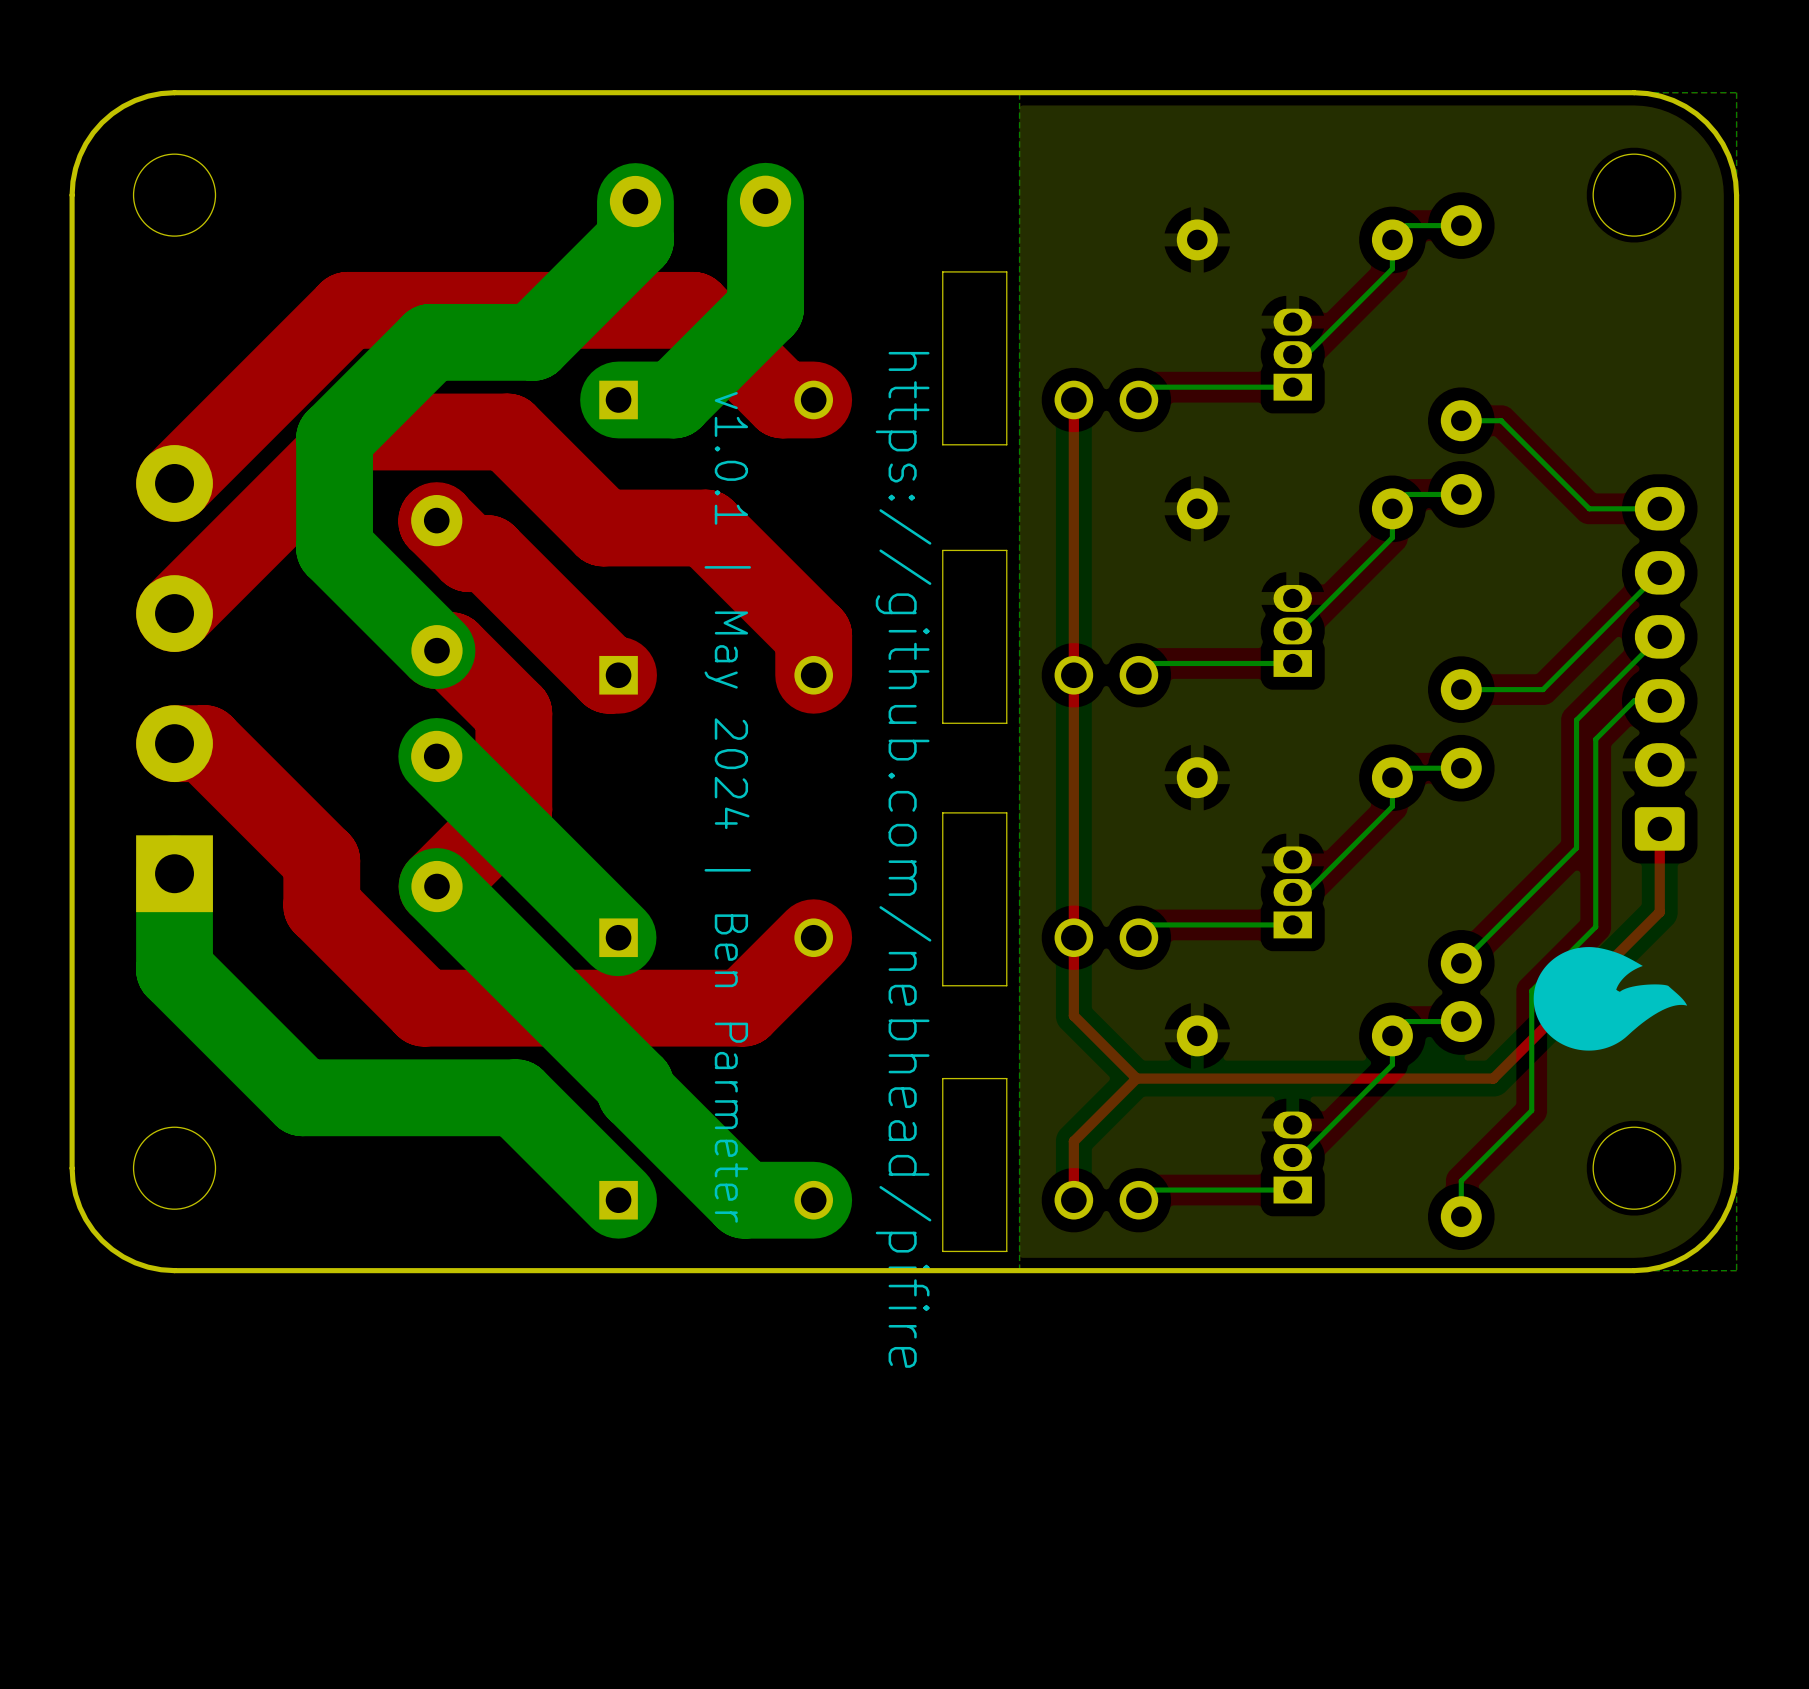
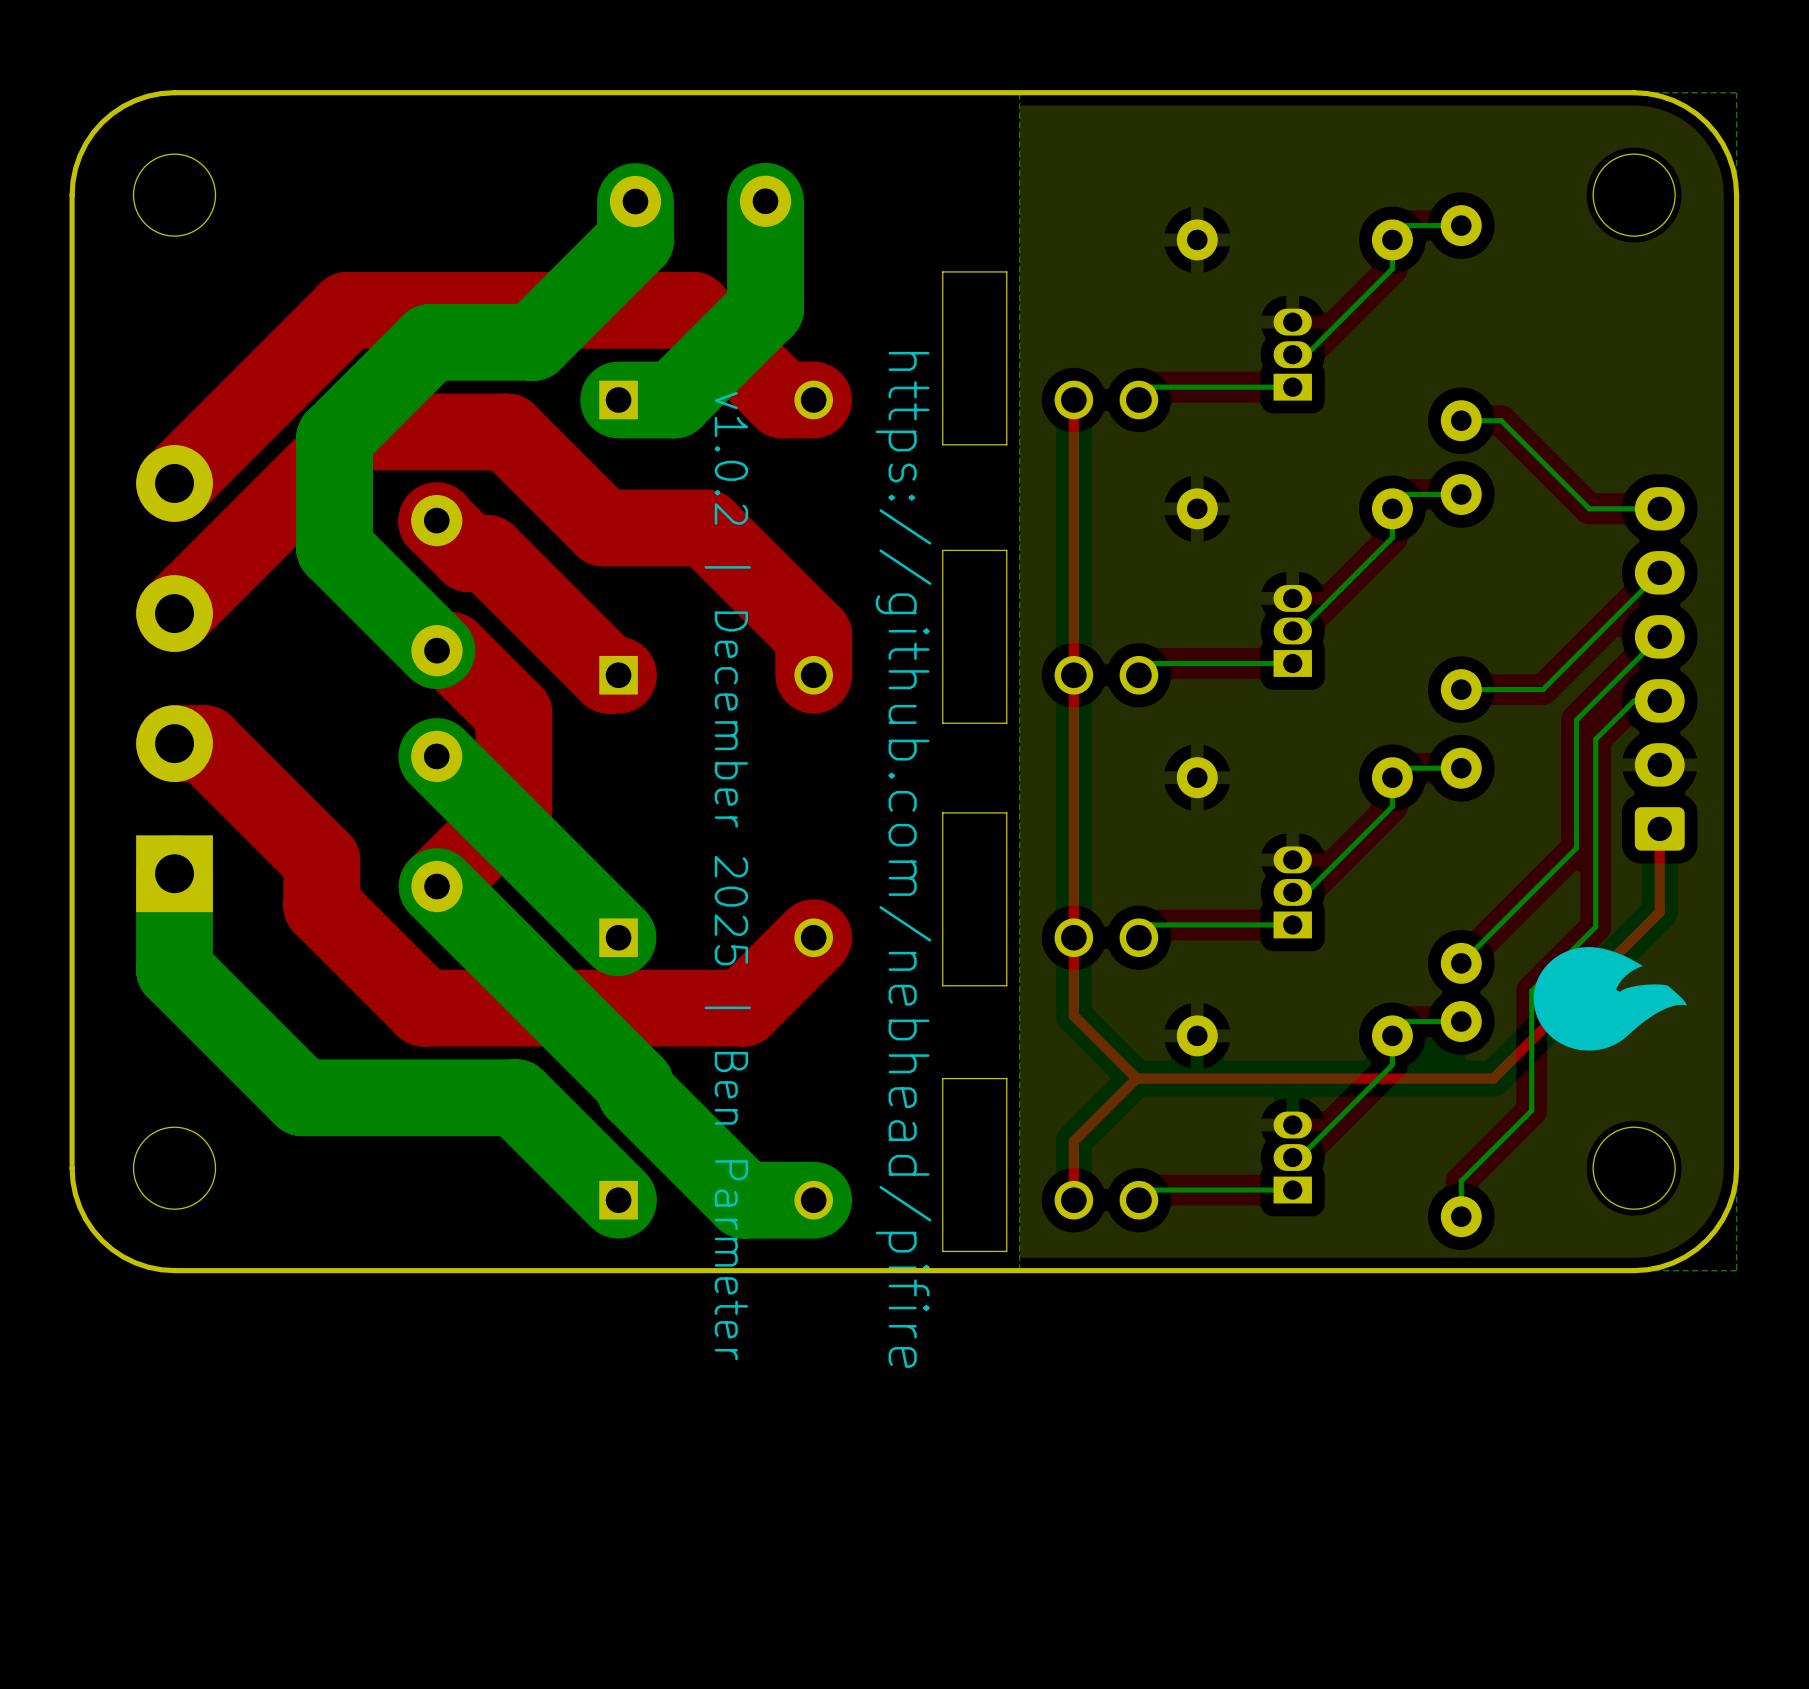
text: v1.0.1 | May 2024 | Ben Parmeter (727, 807) -> v1.0.2 | December 2025 | Ben Parmeter (727, 876)

